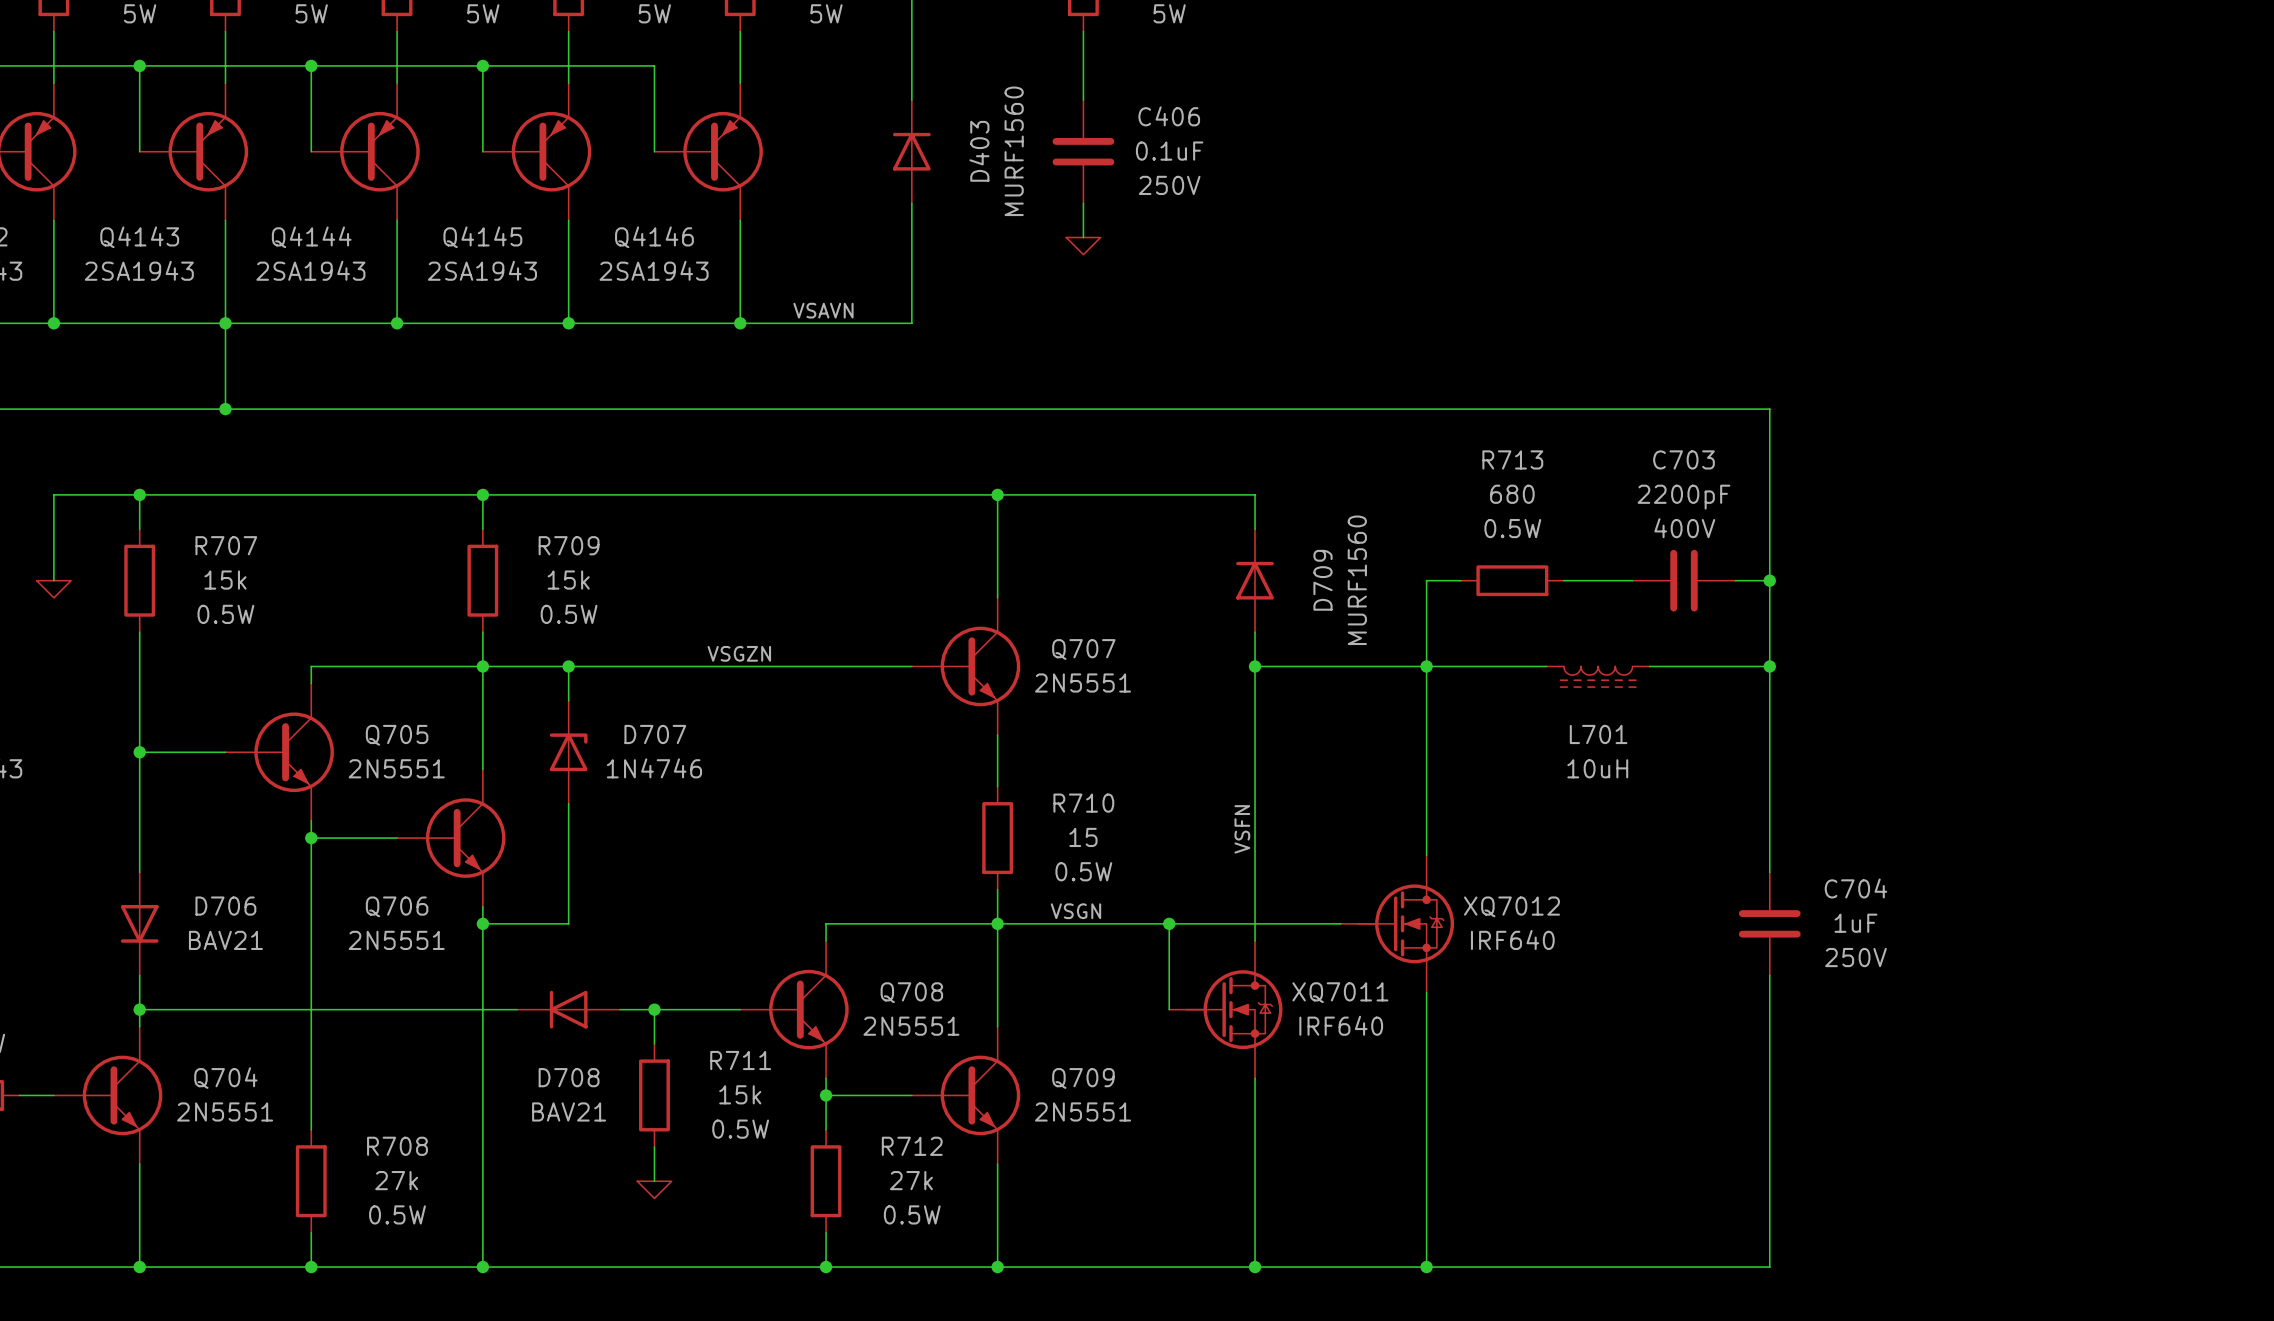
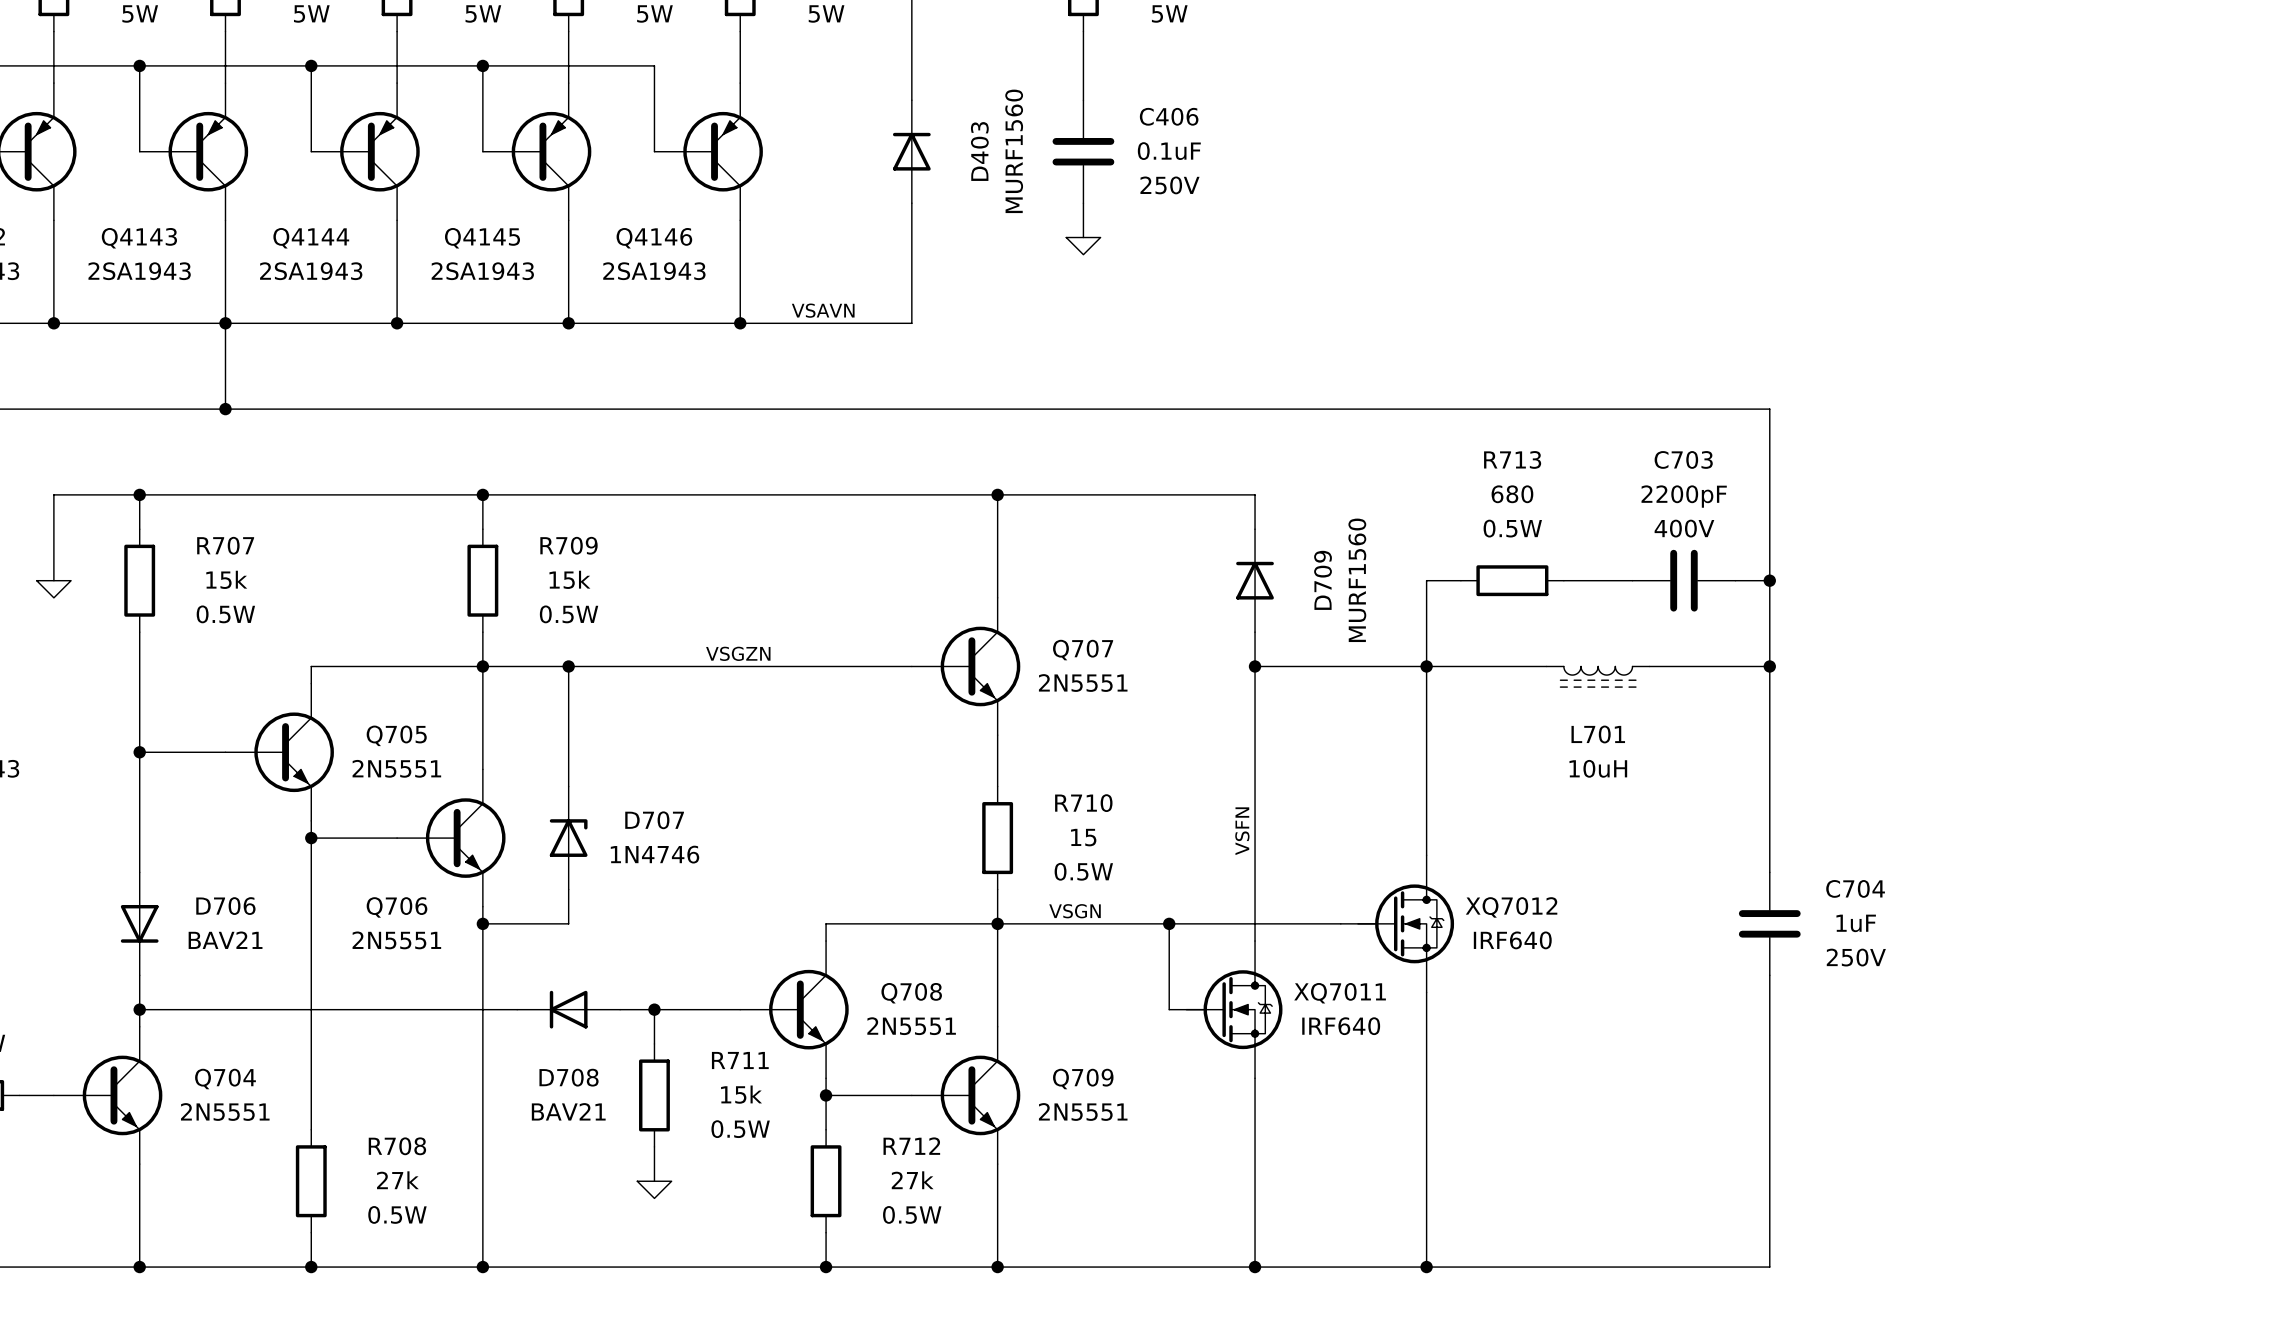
D707 position: (568, 752) -> (568, 838)

